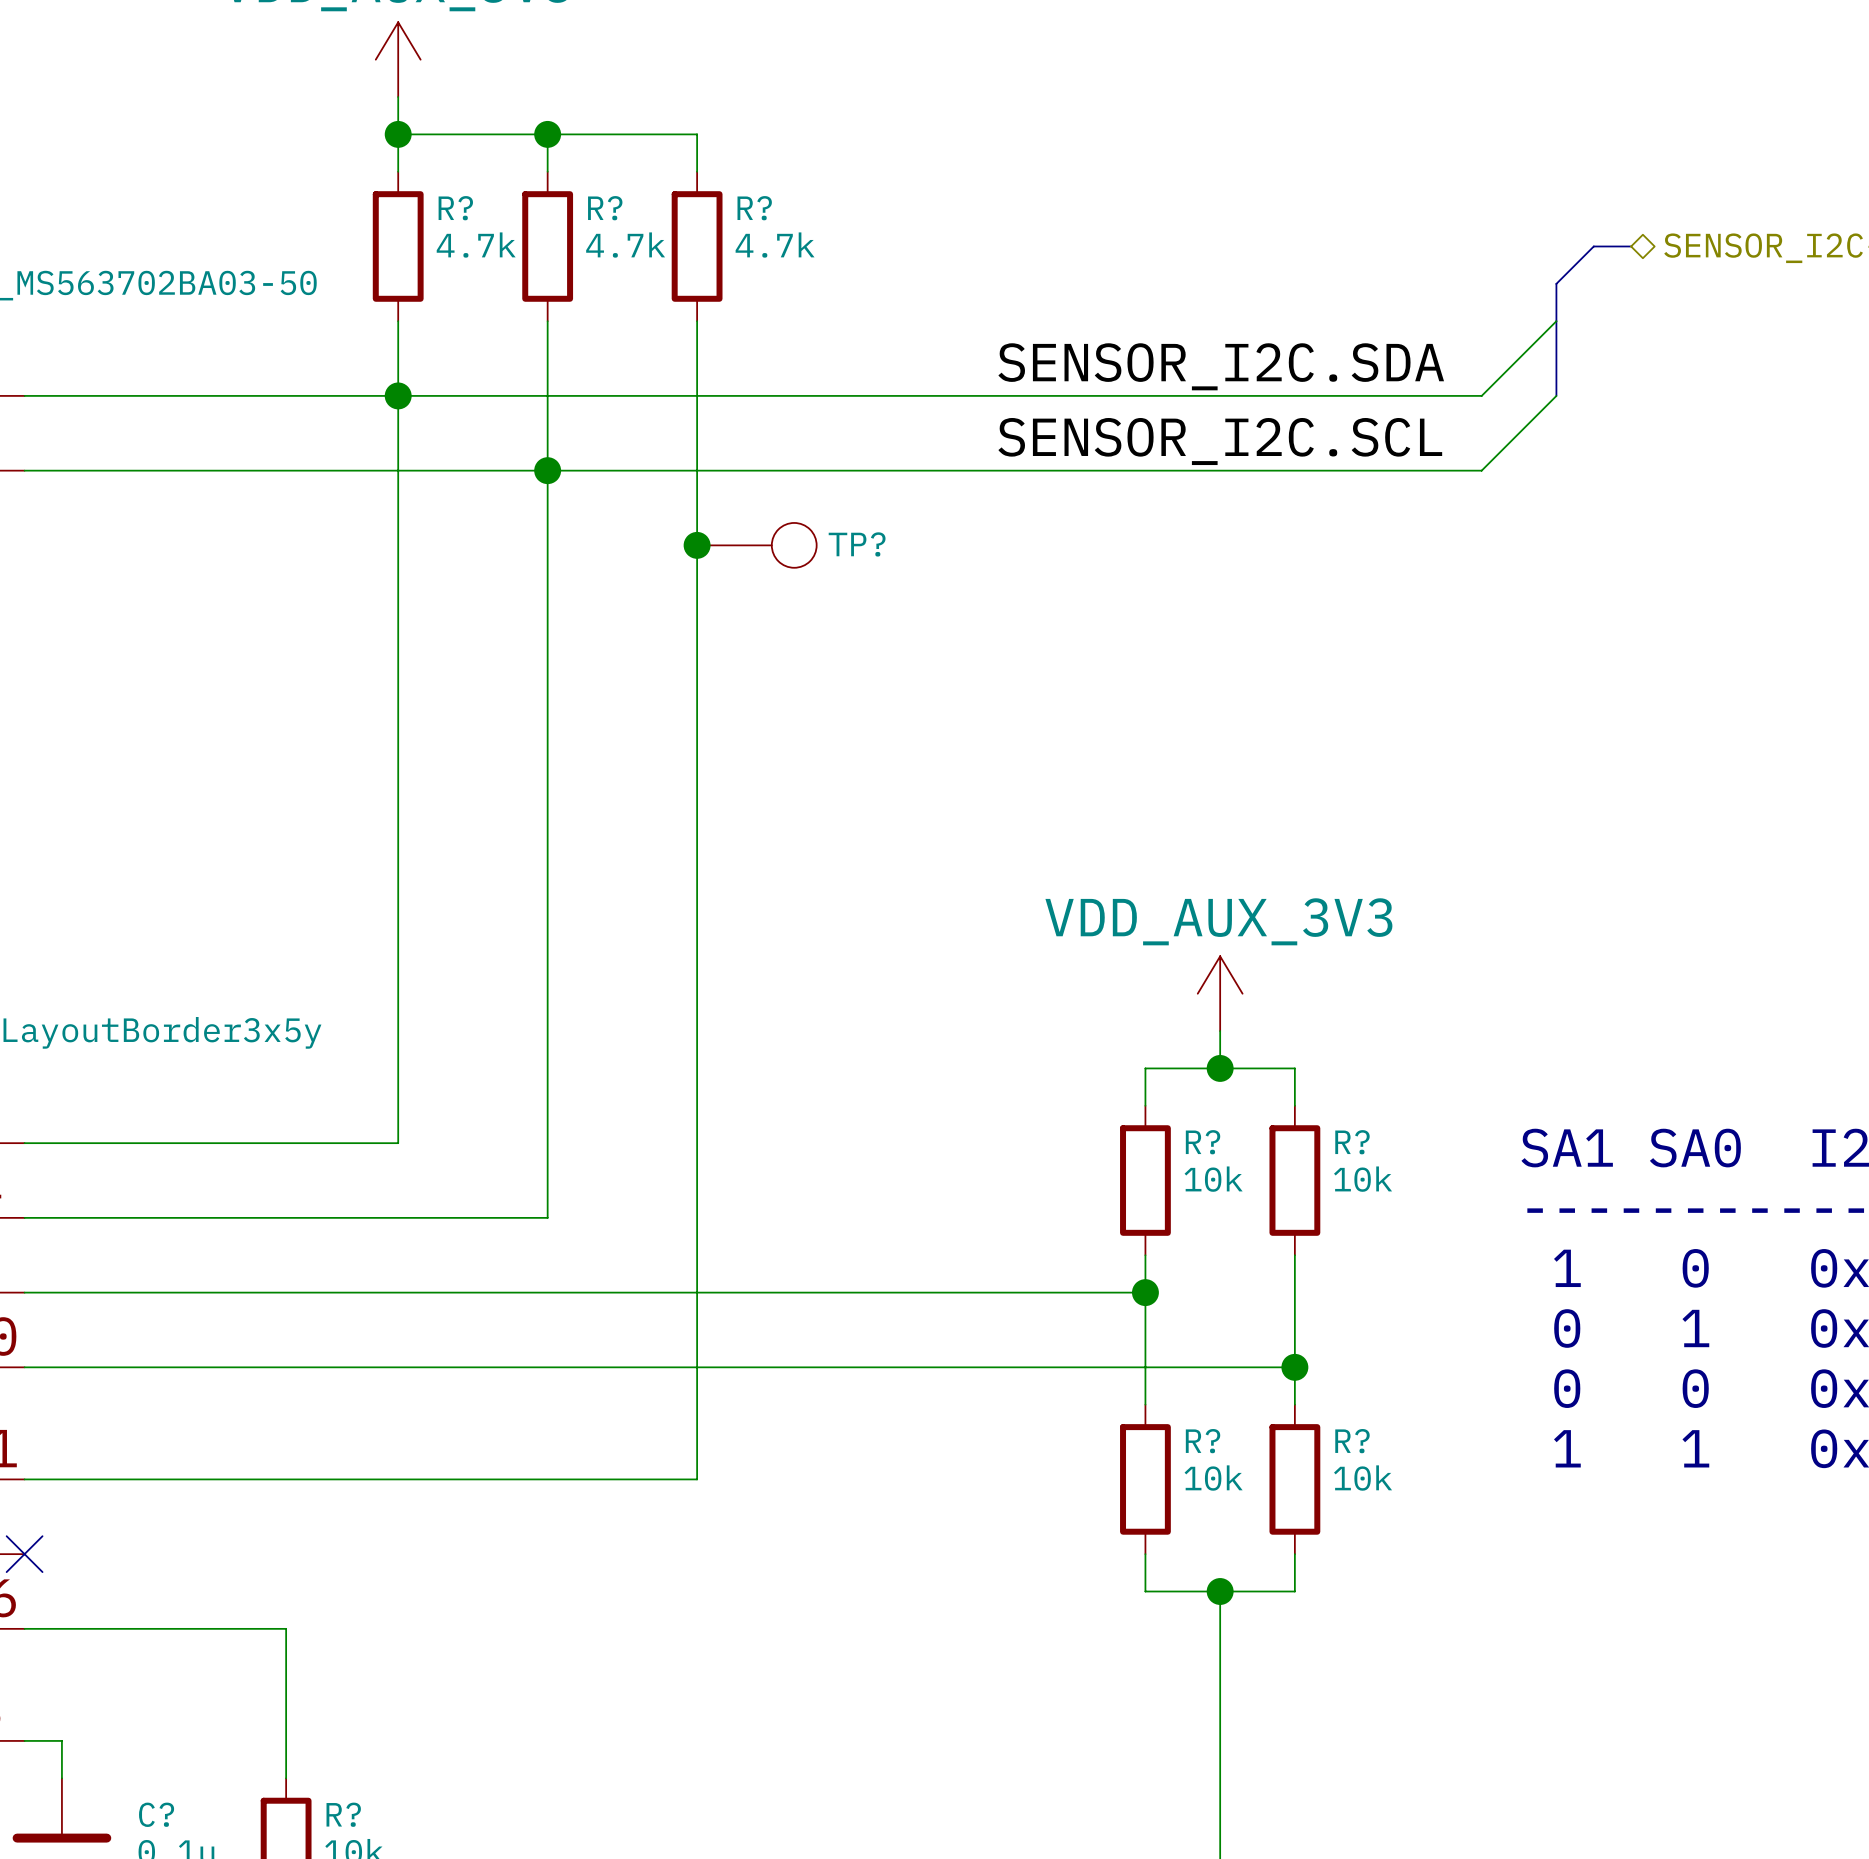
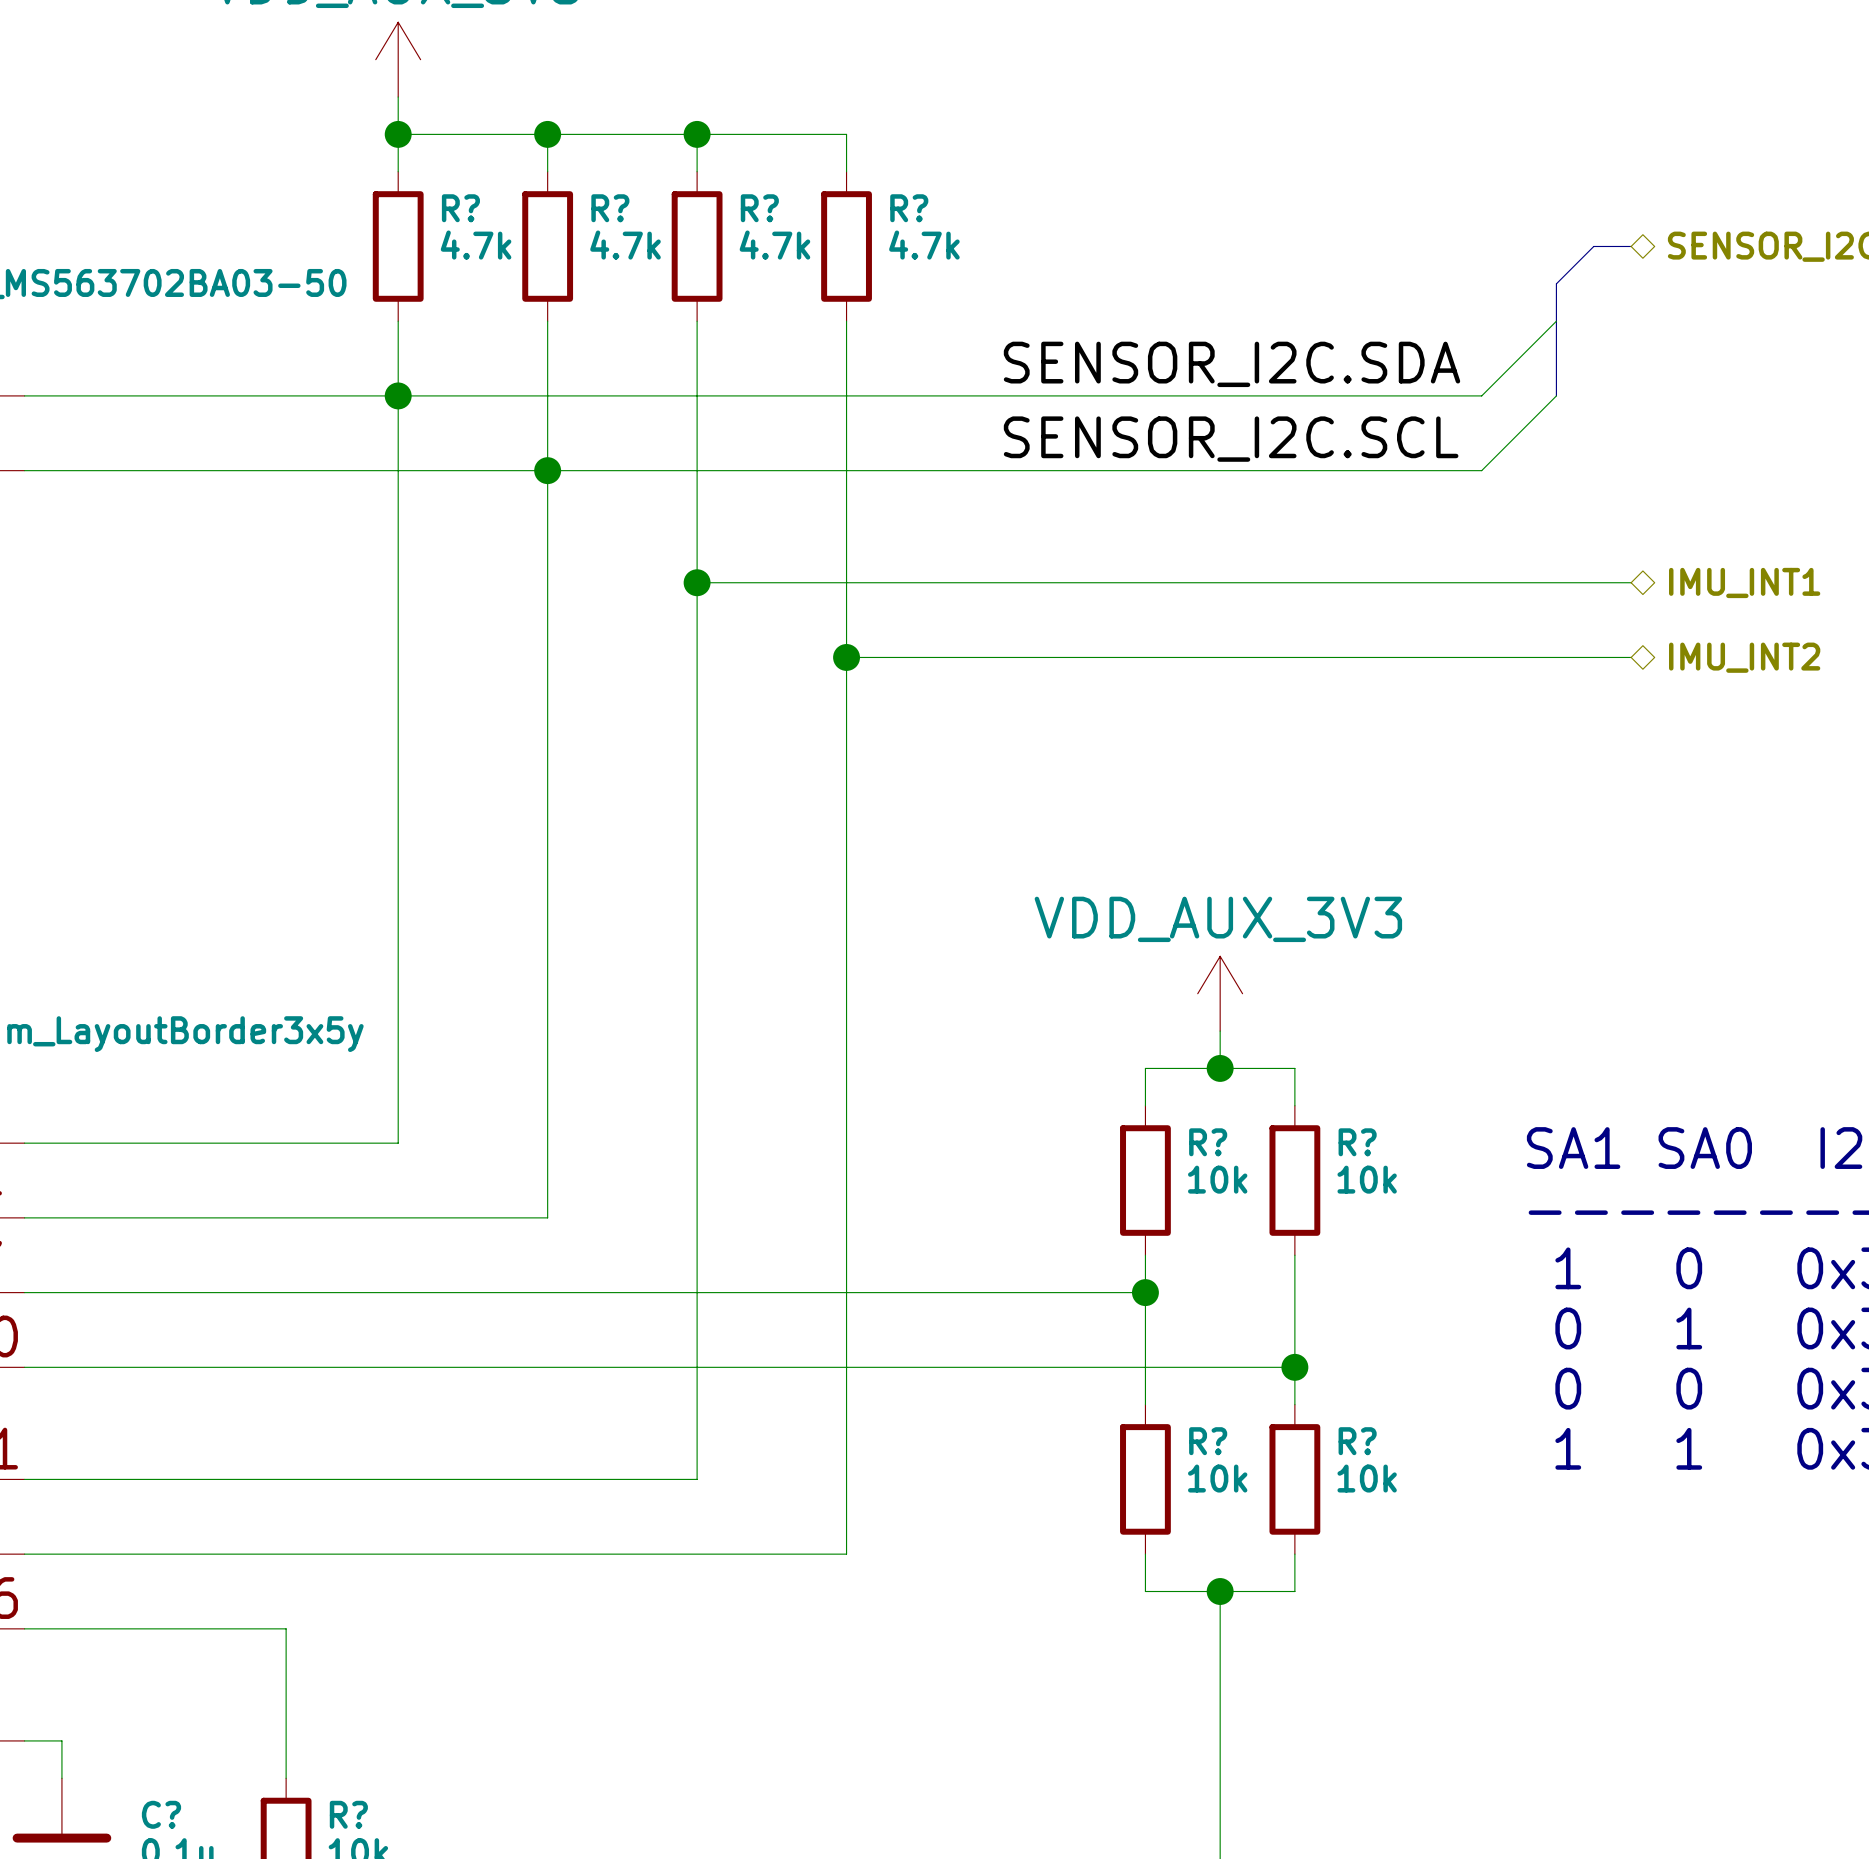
wire: none -> (697, 134) (846, 134) (846, 171)
junction: none -> (697, 134)
R?: none -> 4.7k (846, 246)
wire: none -> (846, 321) (846, 1554) (24, 1554)
junction position: (697, 545) -> (697, 582)
TP?: (756, 545) -> none
wire: none -> (697, 582) (1631, 582)
hierarchical label: none -> IMU_INT1 (1744, 582)
wire: none -> (846, 657) (1631, 657)
junction: none -> (846, 657)
hierarchical label: none -> IMU_INT2 (1744, 657)
no-connect mark: (24, 1554) -> none

